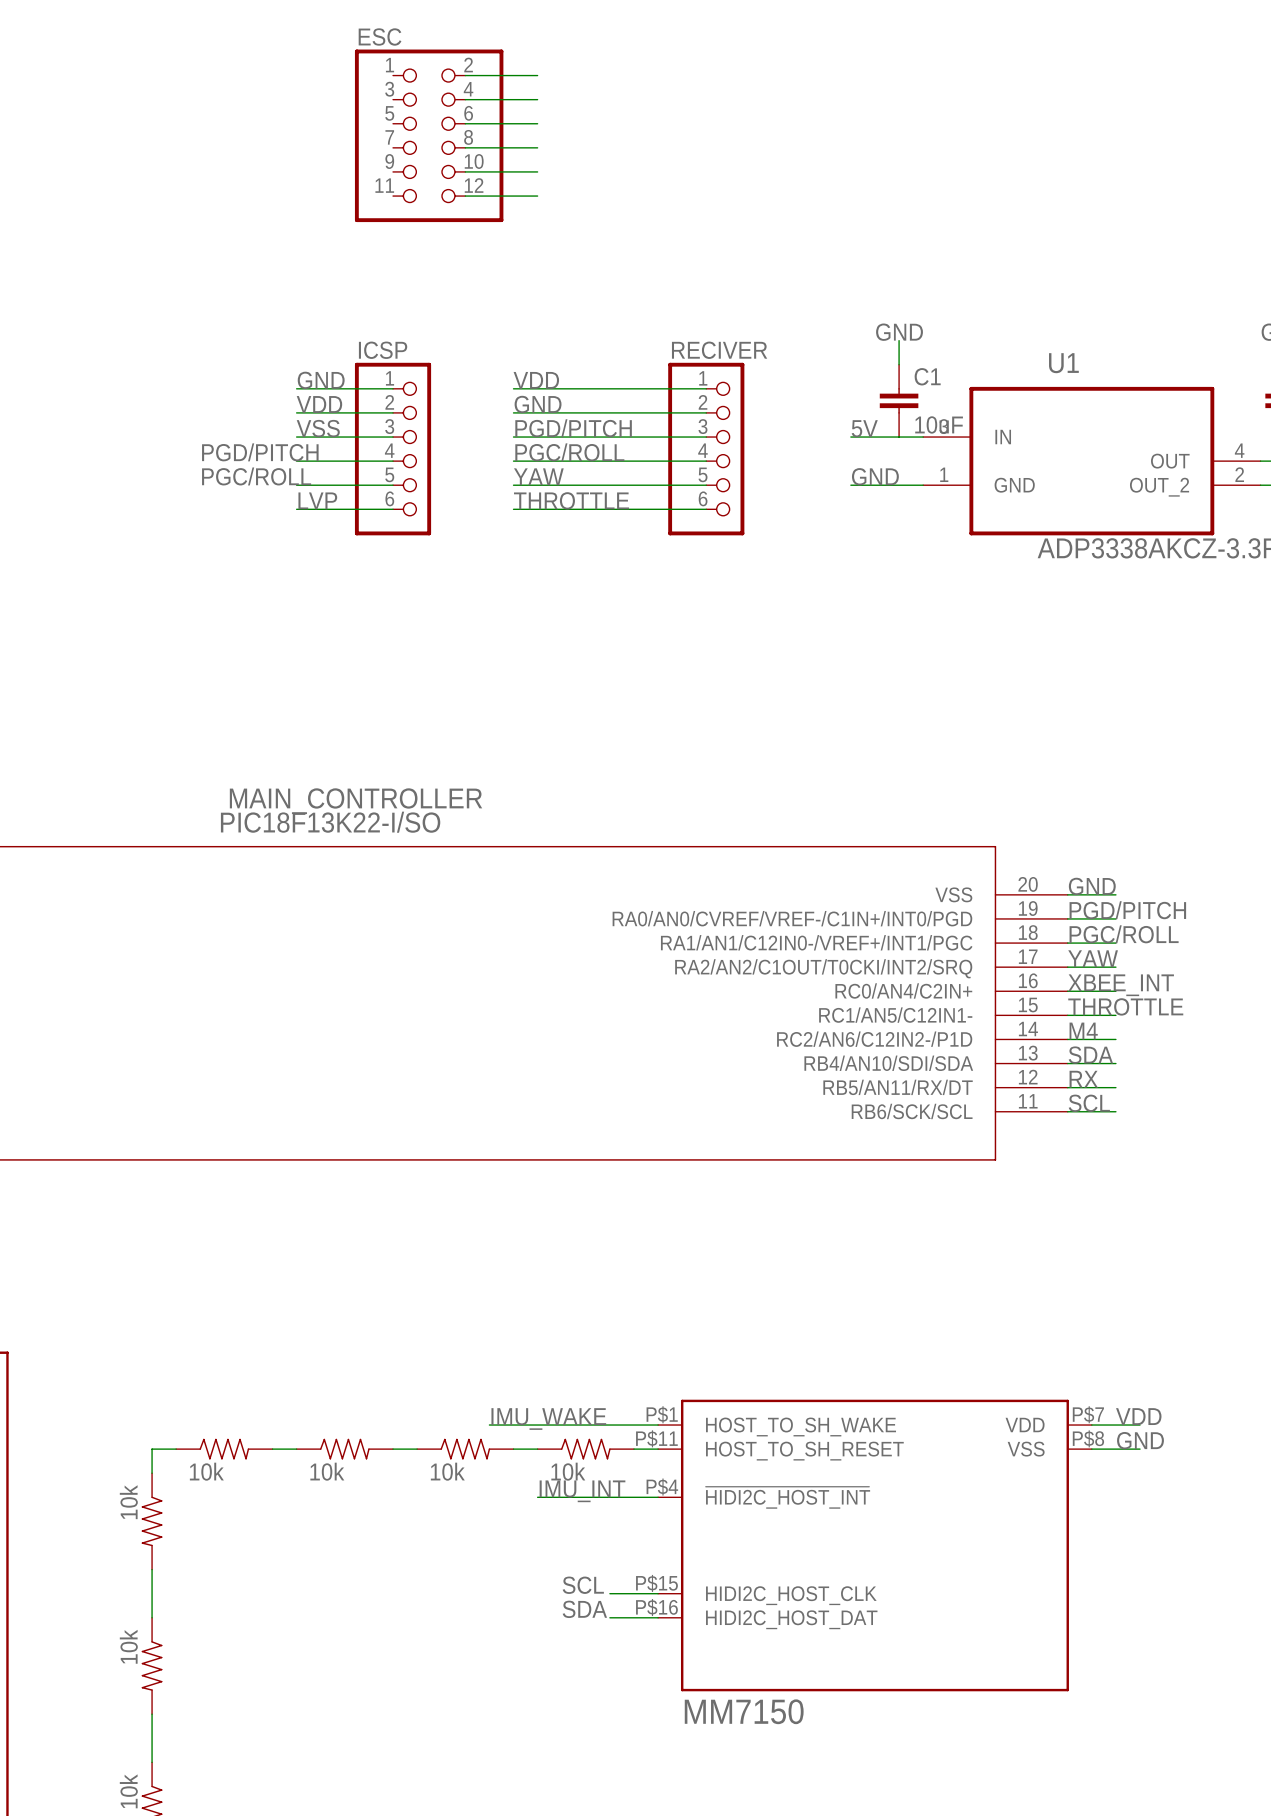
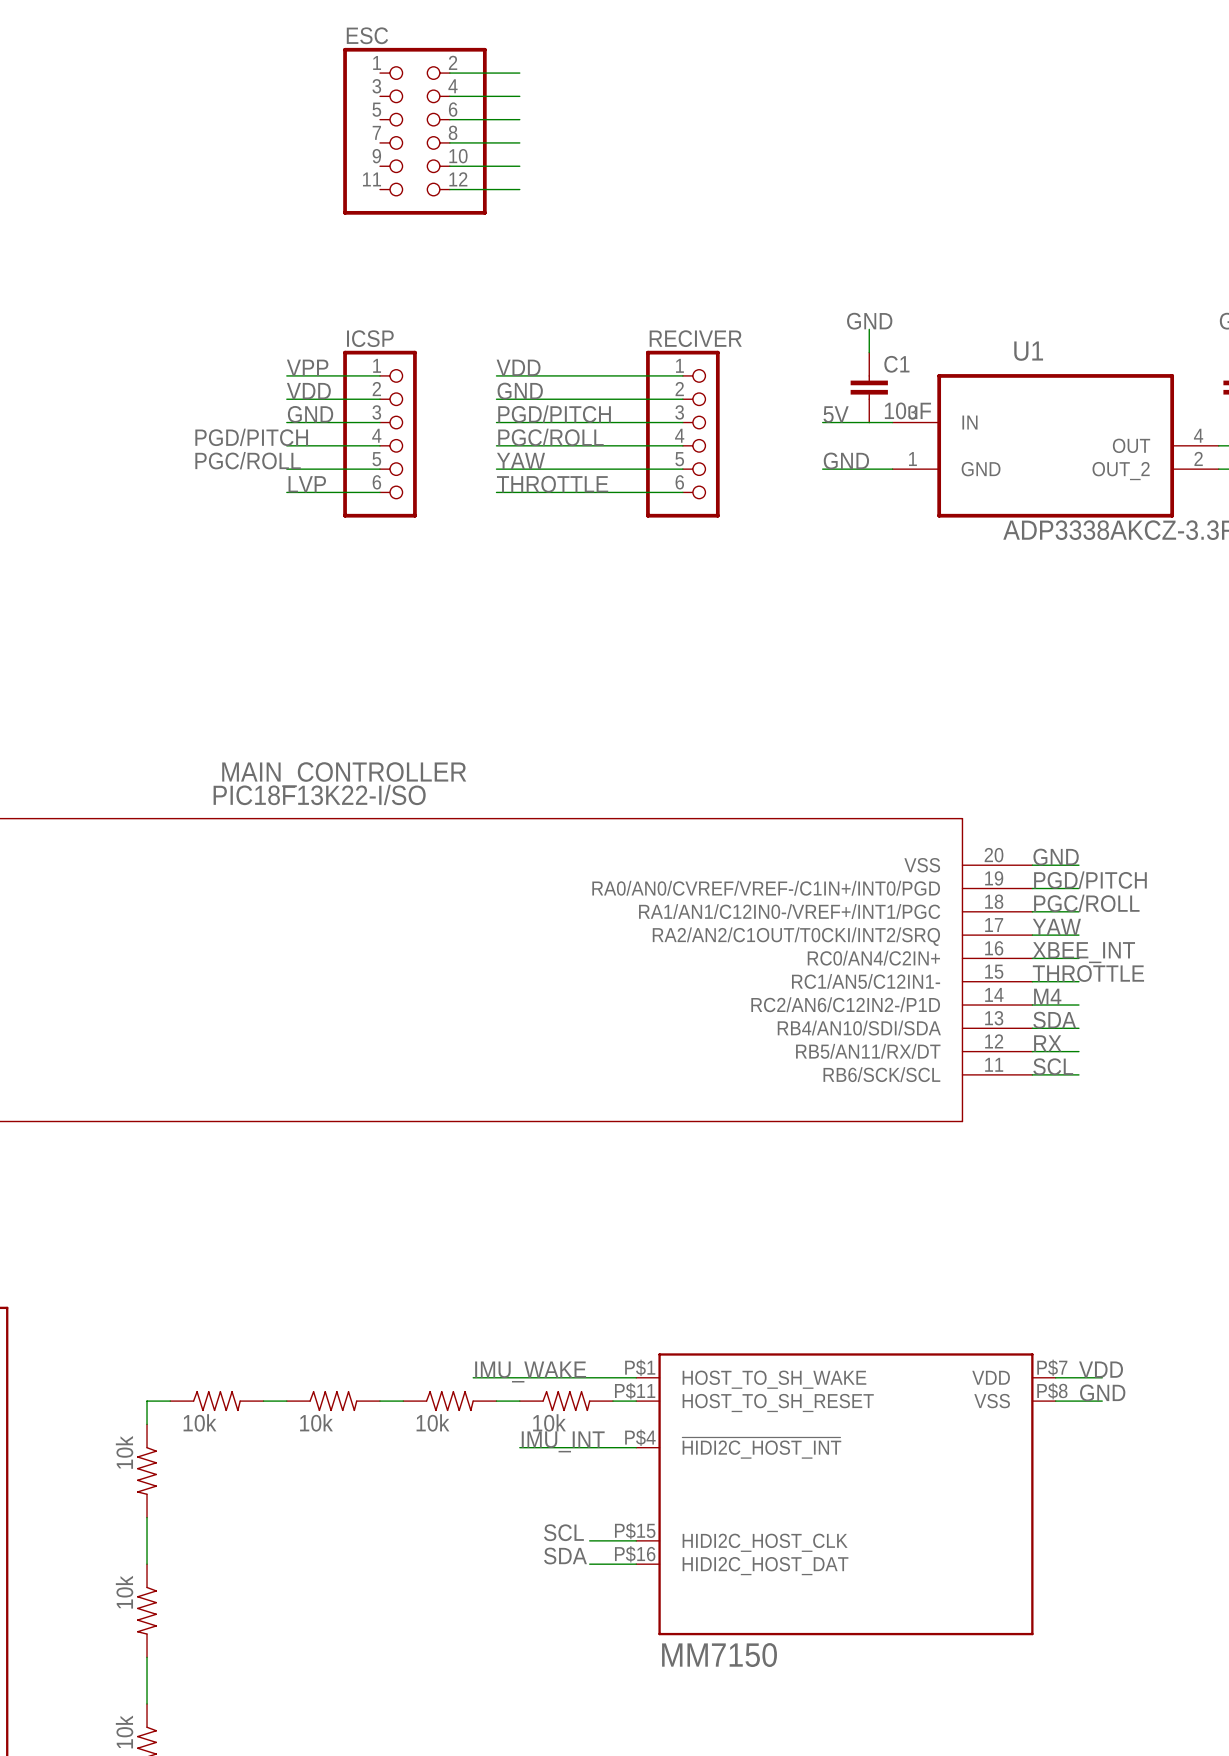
label: GND (321, 380) -> VPP (307, 367)
label: VSS (318, 428) -> GND (310, 414)

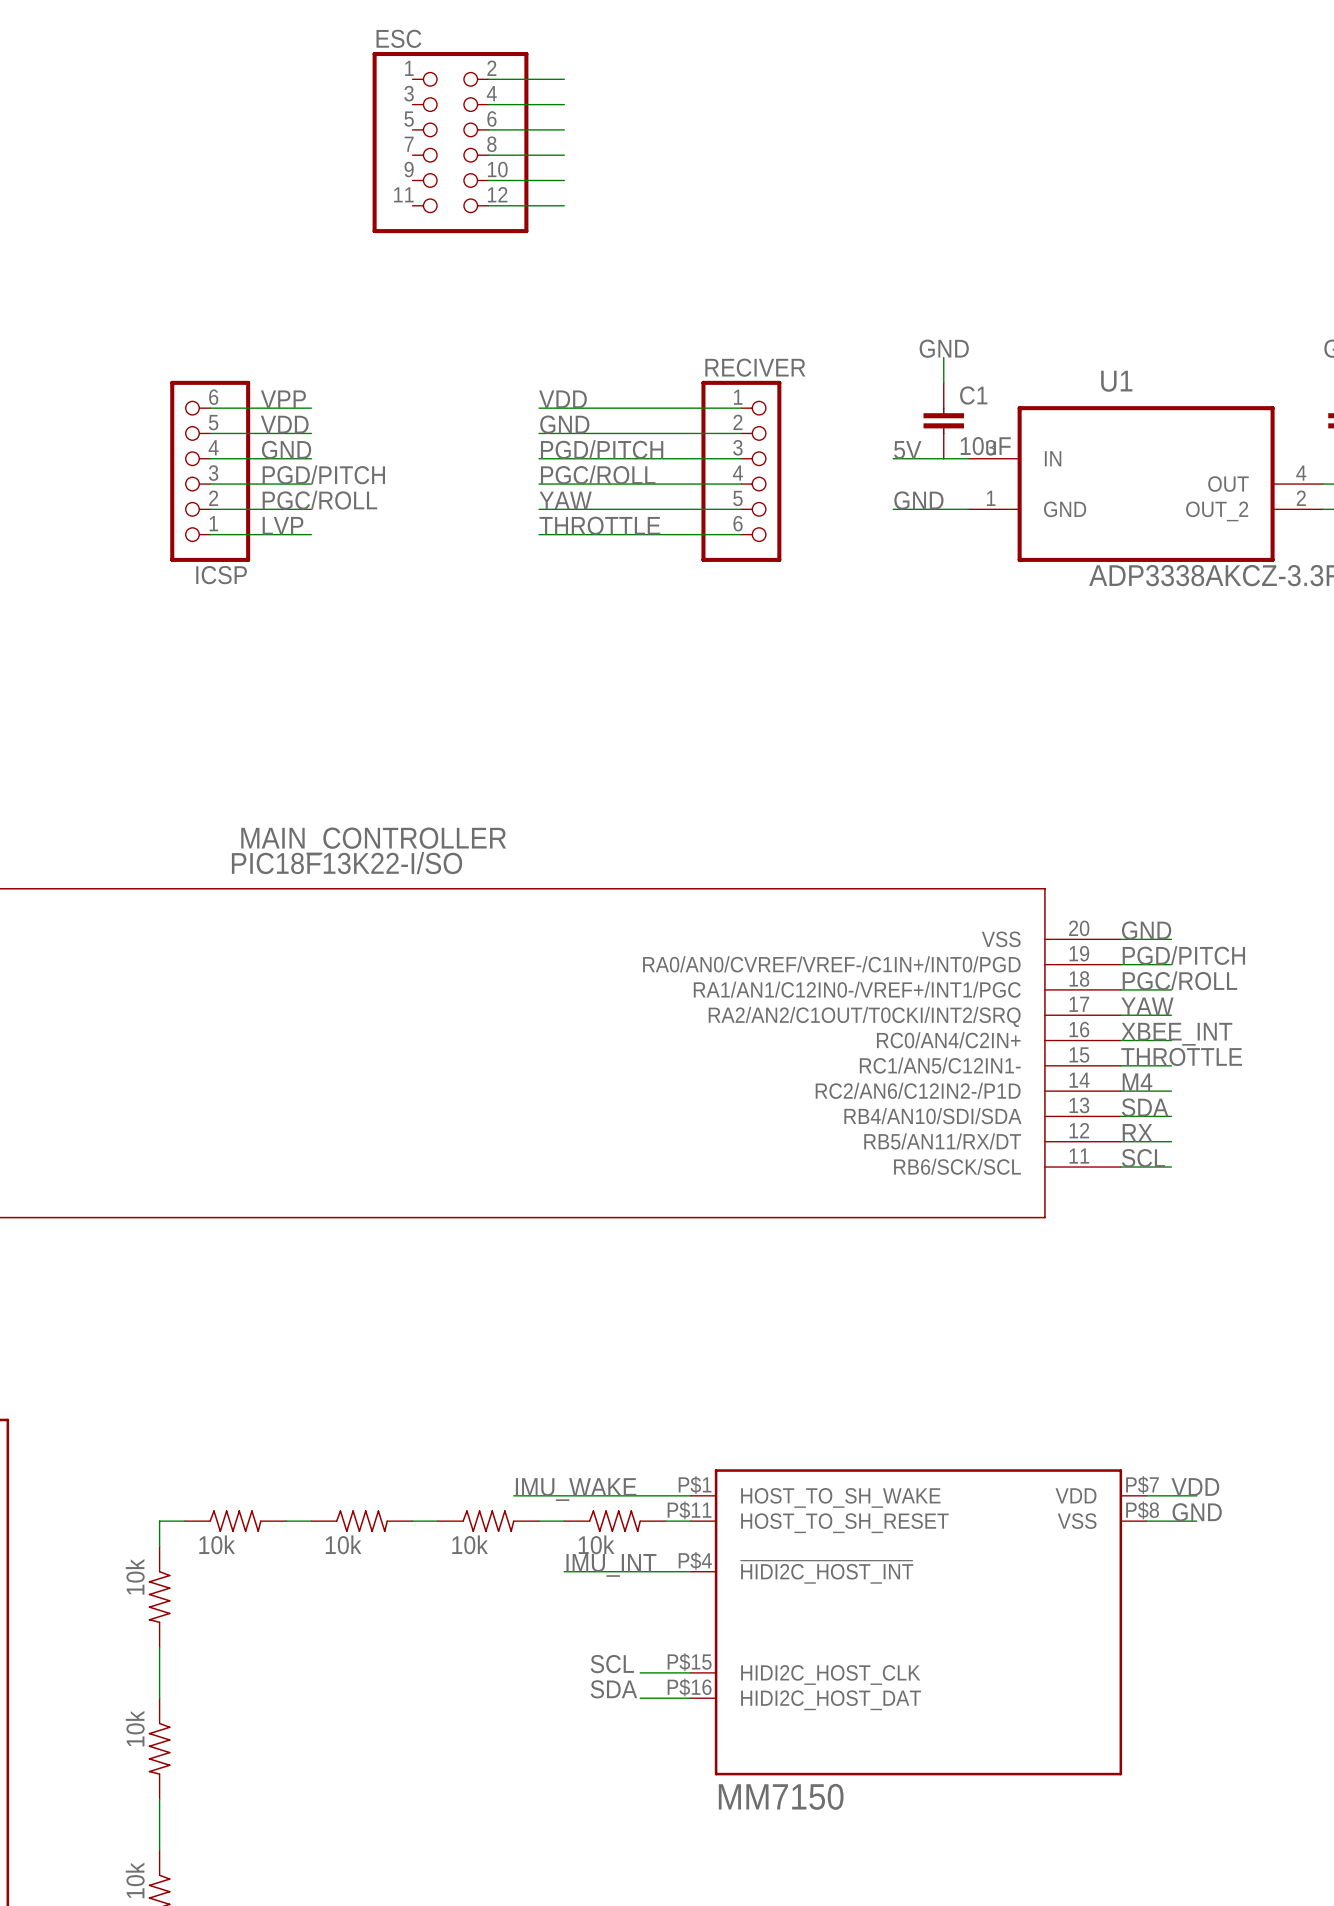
label position: VPP (307, 367) -> VPP (283, 399)
wire: (286, 375) (379, 375) -> (311, 408) (210, 408)
label position: VDD (308, 391) -> VDD (284, 424)
wire: (286, 399) (379, 399) -> (311, 433) (210, 433)
label position: GND (310, 414) -> GND (286, 449)
wire: (286, 422) (379, 422) -> (311, 458) (210, 458)
ICSP rotation: 0° (379, 434) -> 180° (210, 471)
ICSP position: (379, 434) -> (210, 471)
label position: PGD/PITCH (251, 437) -> PGD/PITCH (323, 474)
wire: (286, 445) (379, 445) -> (311, 484) (210, 484)
label position: PGC/ROLL (248, 460) -> PGC/ROLL (319, 500)
wire: (286, 469) (379, 469) -> (311, 509) (210, 509)
label position: LVP (307, 484) -> LVP (283, 525)
wire: (286, 492) (379, 492) -> (311, 534) (210, 534)

